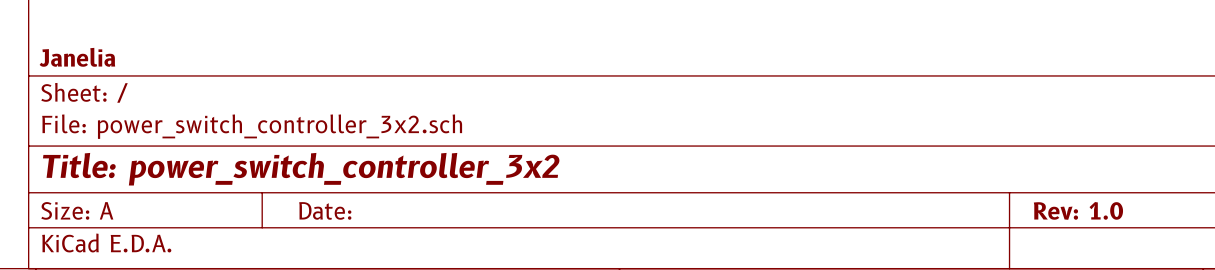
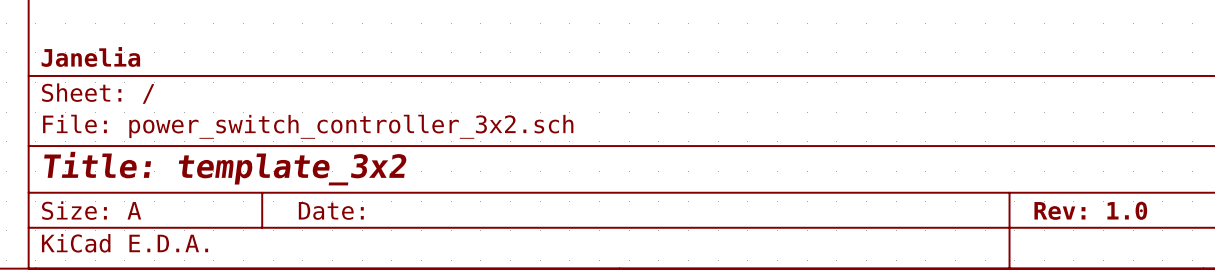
title block: Title: power_switch_controller_3x2 (301, 169) -> Title: template_3x2 (225, 168)

